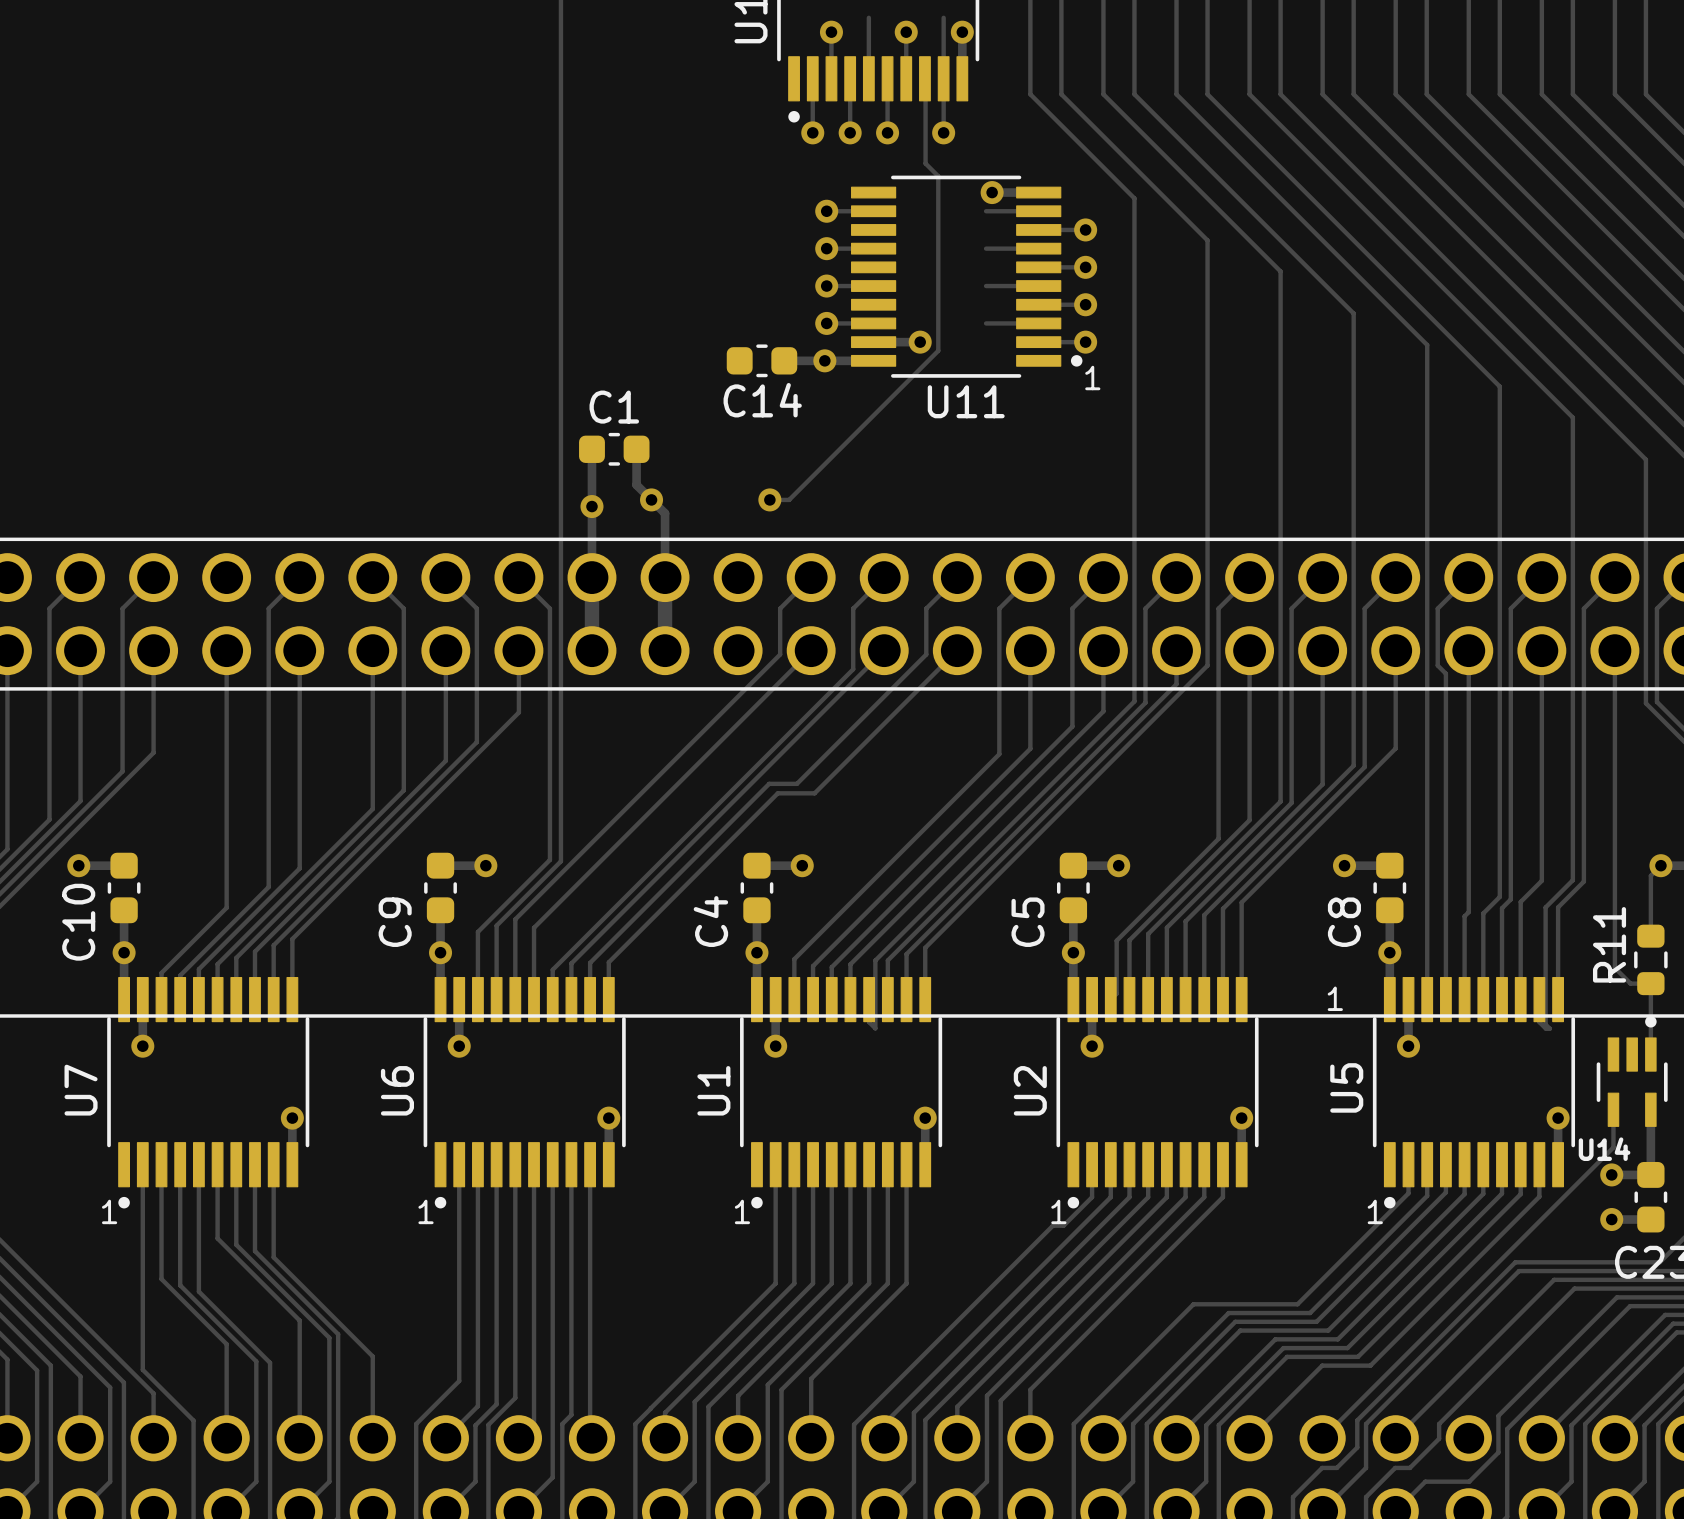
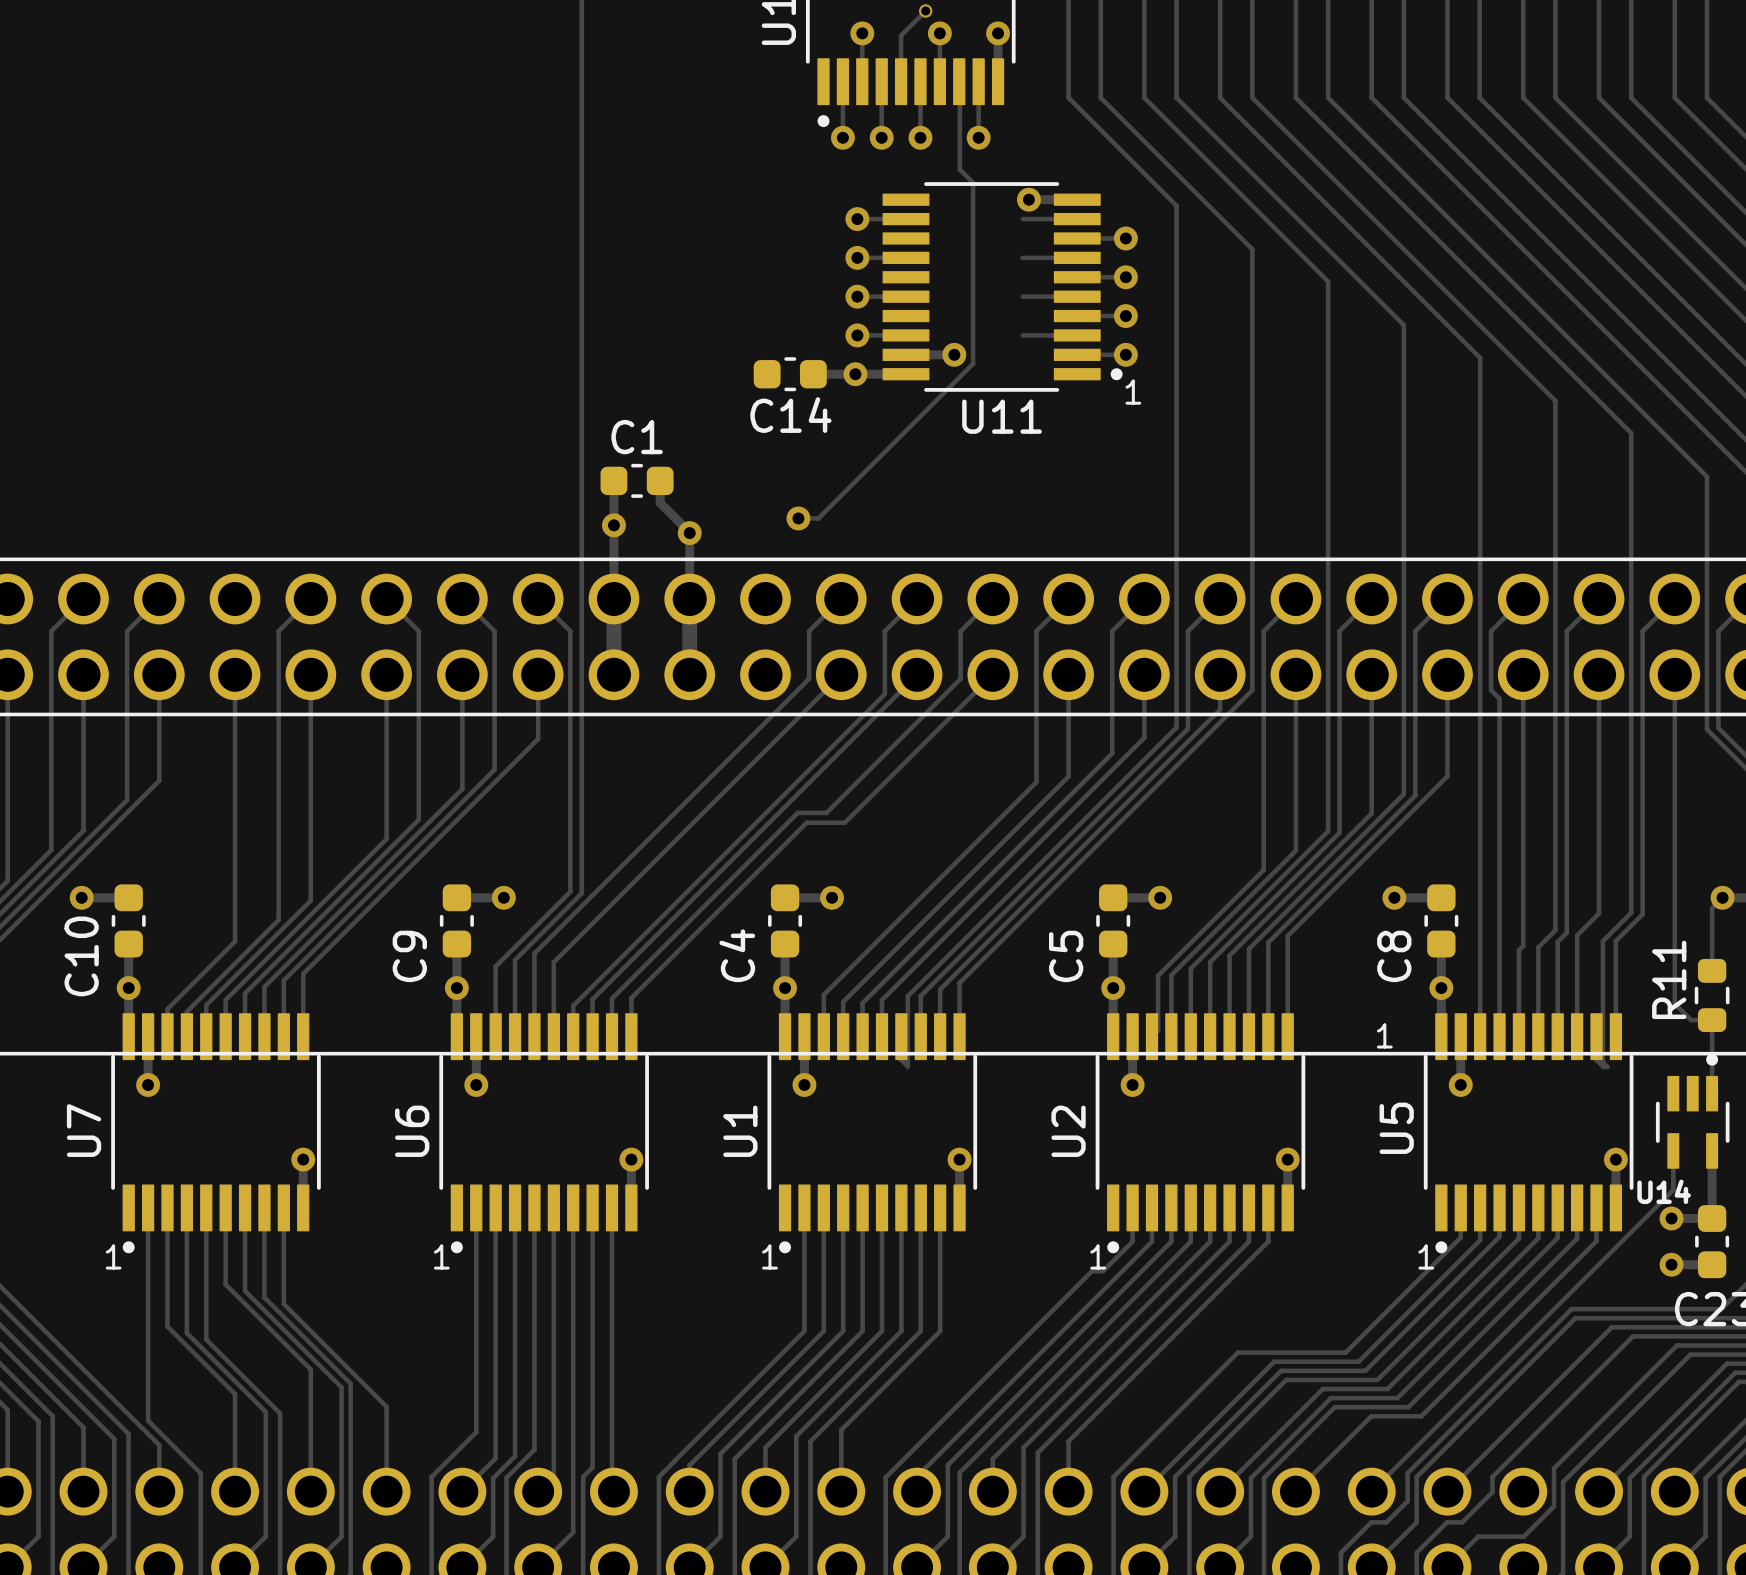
via: none -> (925, 11)
track: (868, 17) (868, 34) -> (925, 11) (901, 35)
track: (943, 17) (943, 78) -> none
C1 position: (614, 449) -> (637, 480)
via position: (651, 499) -> (689, 533)

